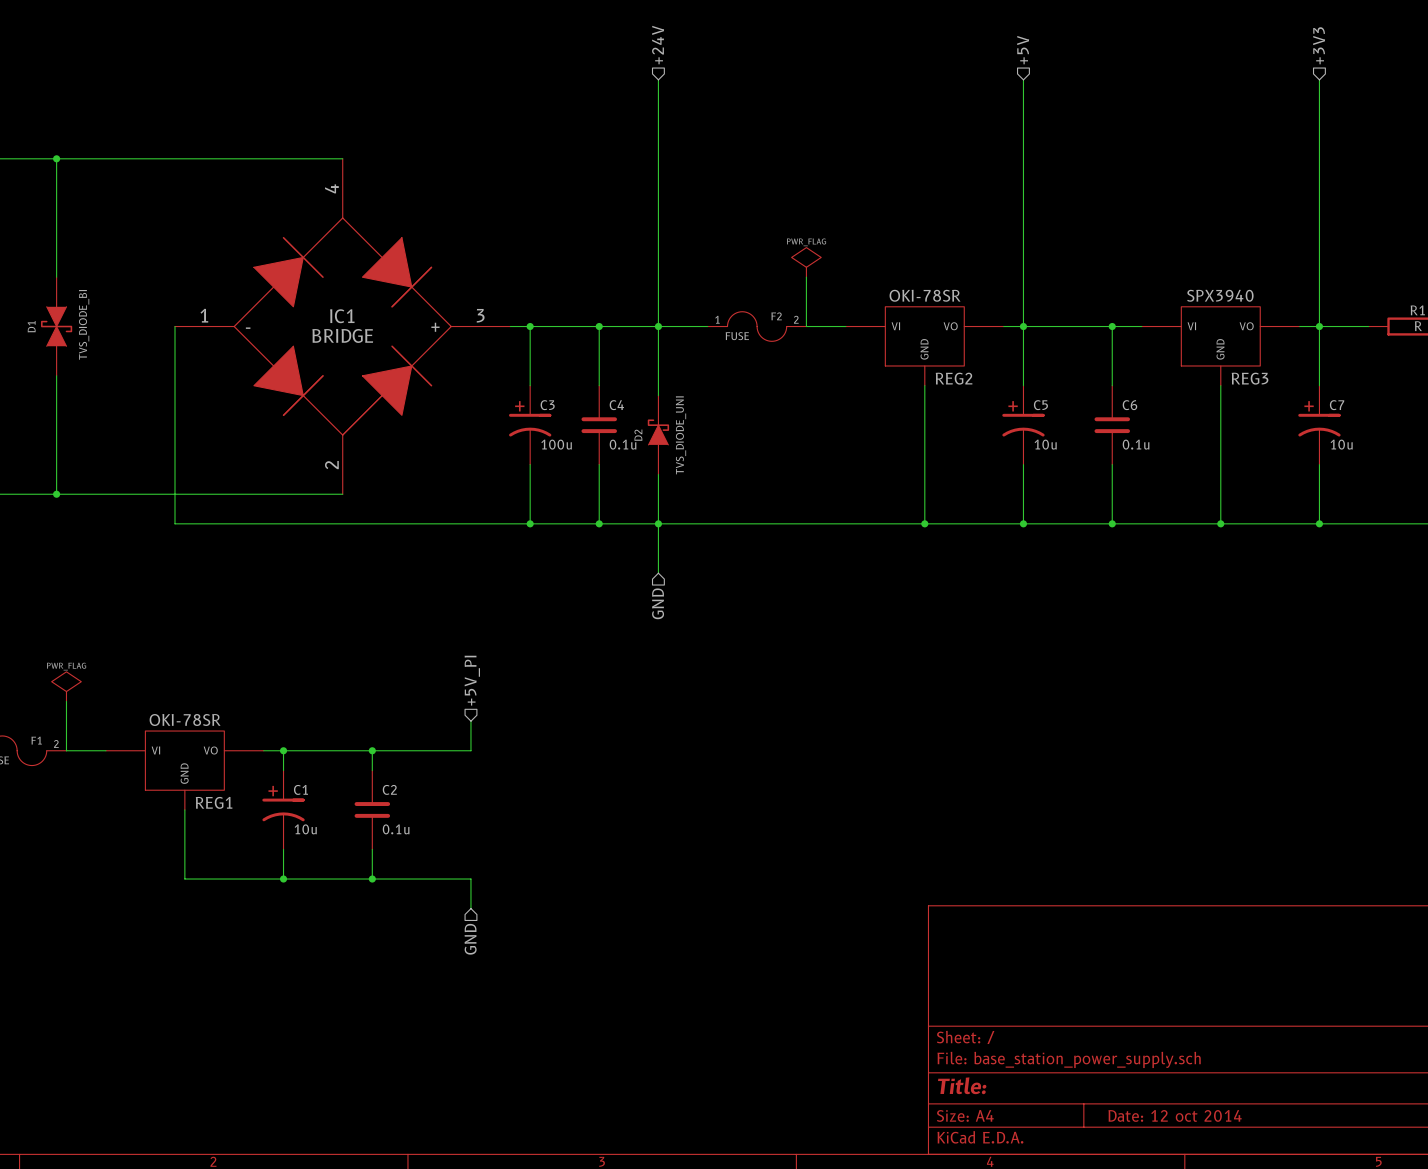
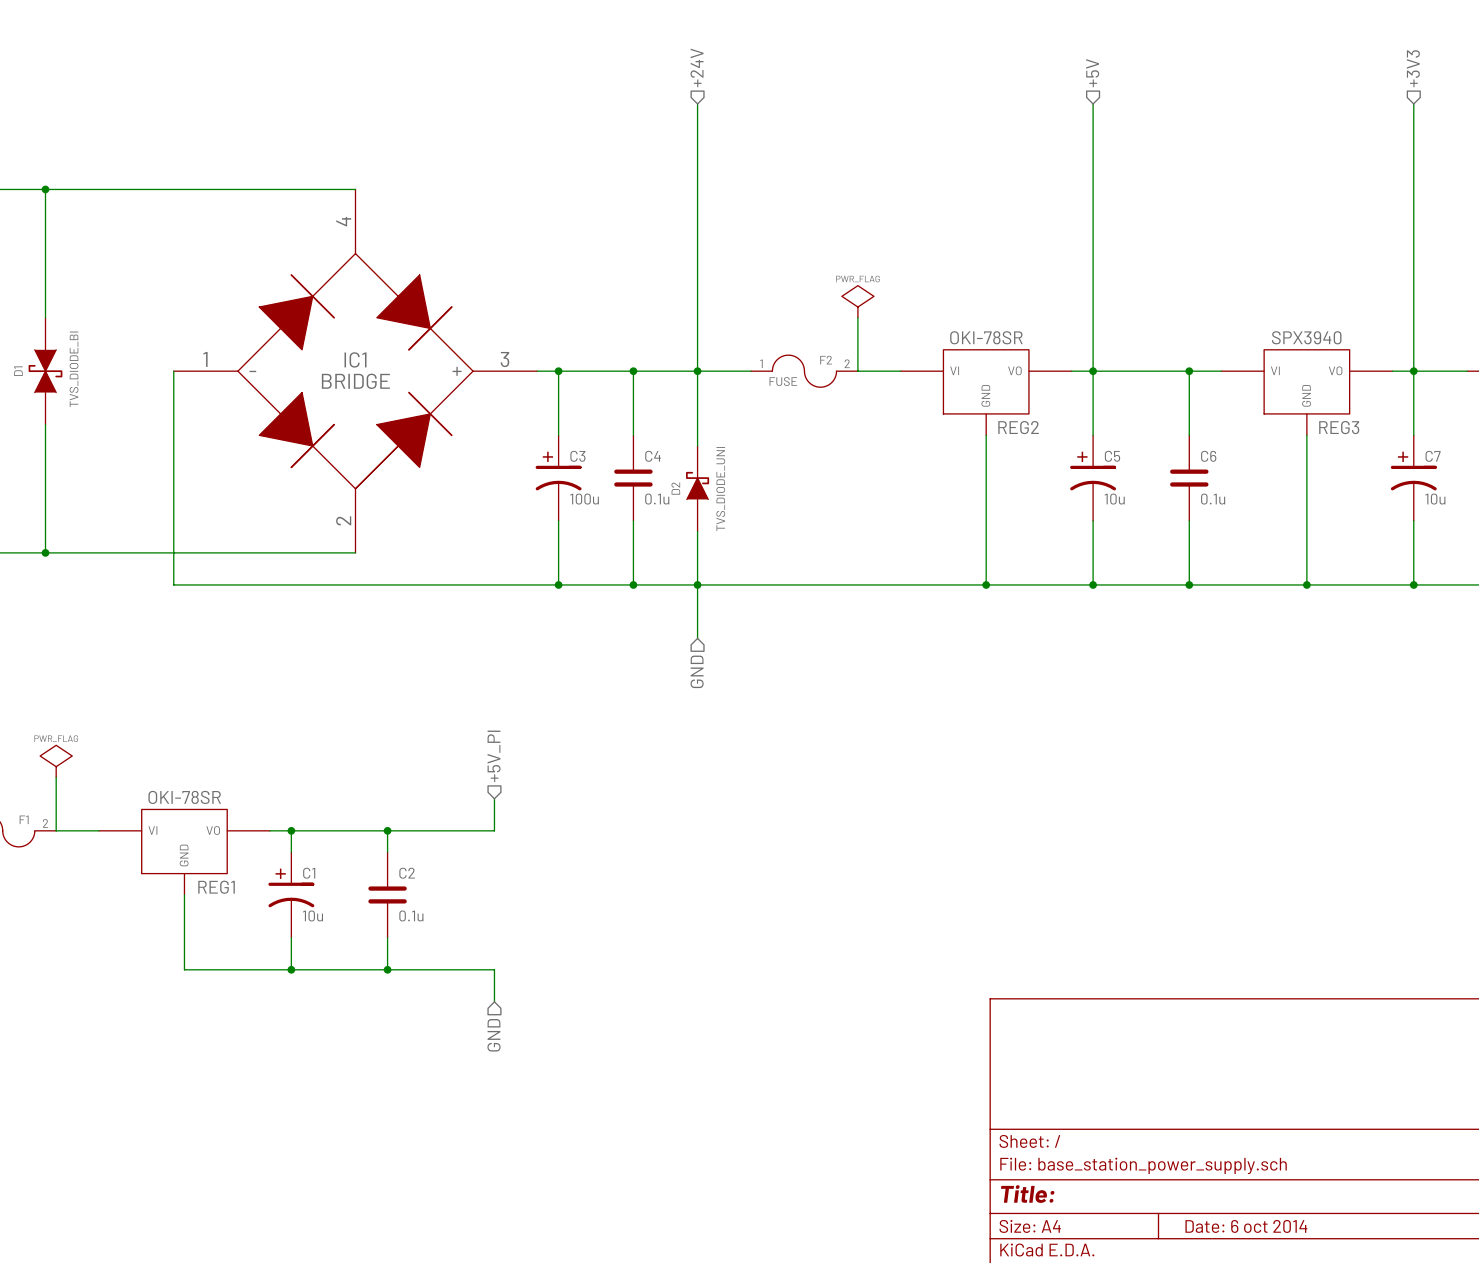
title block: Date: 12 oct 2014 (1175, 1115) -> Date: 6 oct 2014 (1246, 1226)

